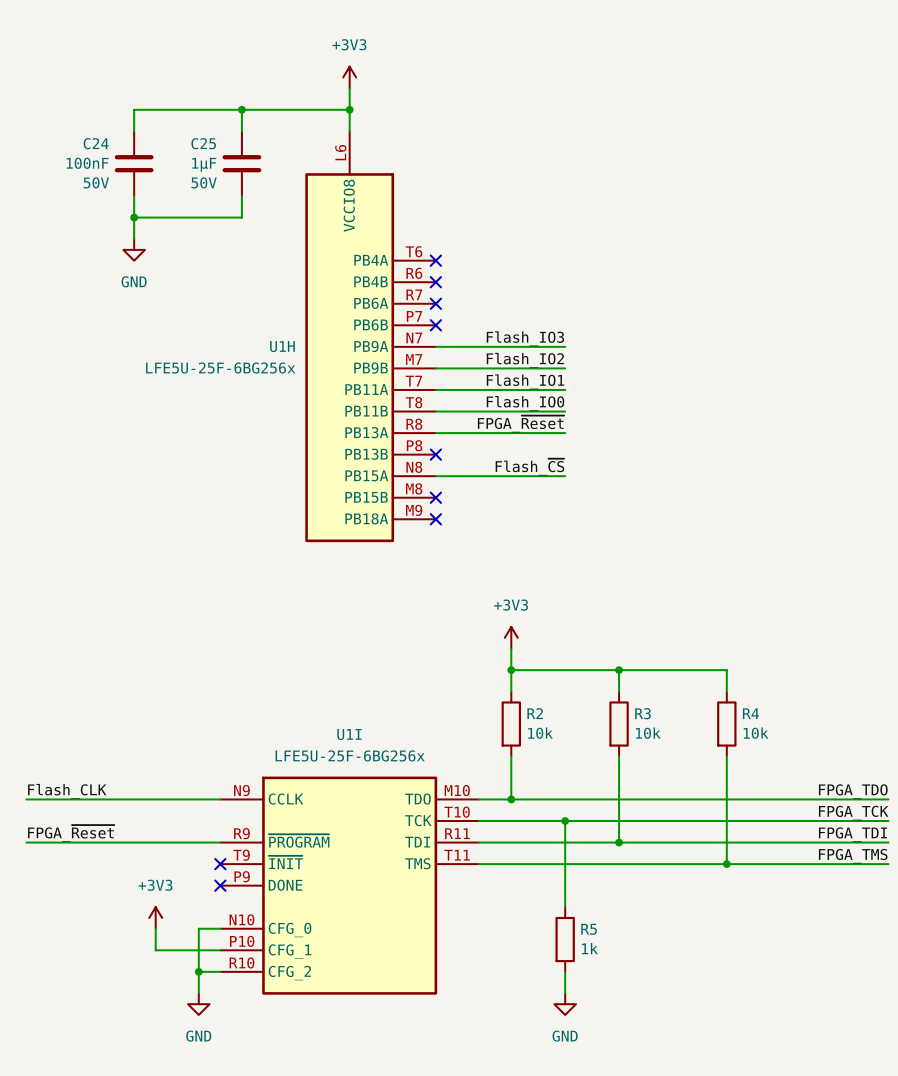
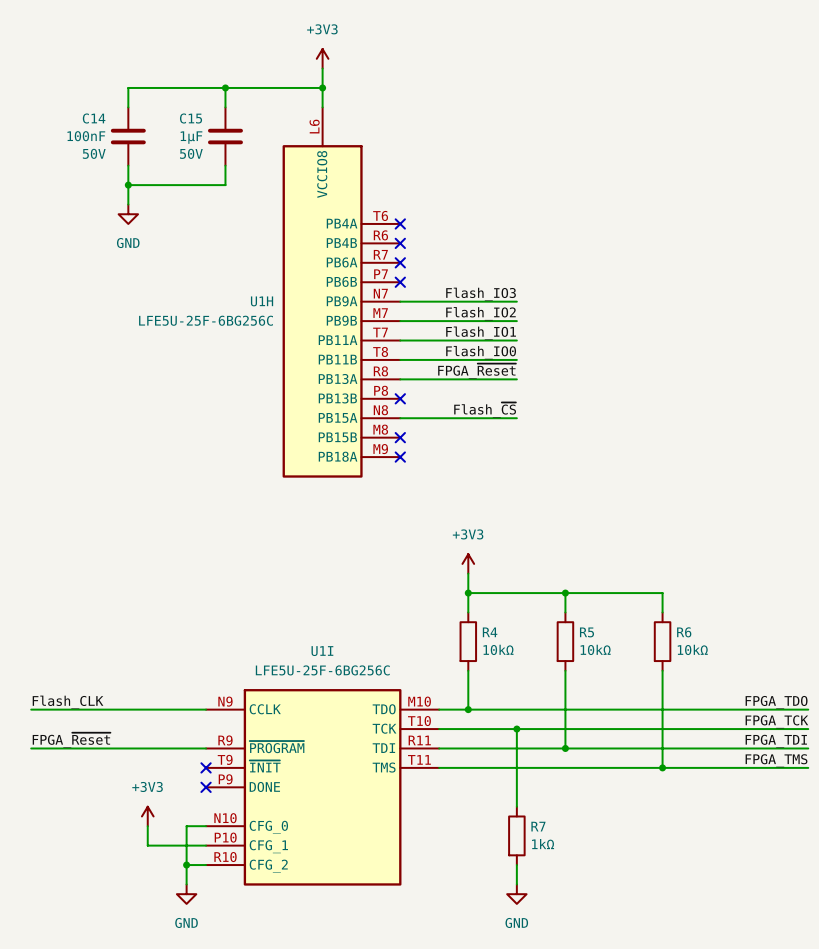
C24 name: C24 (96, 143) -> C14 (94, 118)
C25 name: C25 (203, 143) -> C15 (191, 118)
U1H value: LFE5U-25F-6BG256x (220, 368) -> LFE5U-25F-6BG256C (206, 320)
R2 name: R2 (535, 713) -> R4 (490, 632)
R3 name: R3 (643, 713) -> R5 (586, 632)
R4 name: R4 (750, 713) -> R6 (684, 632)
R2 value: 10k (540, 733) -> 10kΩ (498, 649)
R3 value: 10k (648, 733) -> 10kΩ (595, 649)
R4 value: 10k (756, 733) -> 10kΩ (692, 649)
U1I value: LFE5U-25F-6BG256x (350, 755) -> LFE5U-25F-6BG256C (322, 670)
R5 name: R5 (589, 929) -> R7 (538, 826)
R5 value: 1k (589, 948) -> 1kΩ (543, 844)

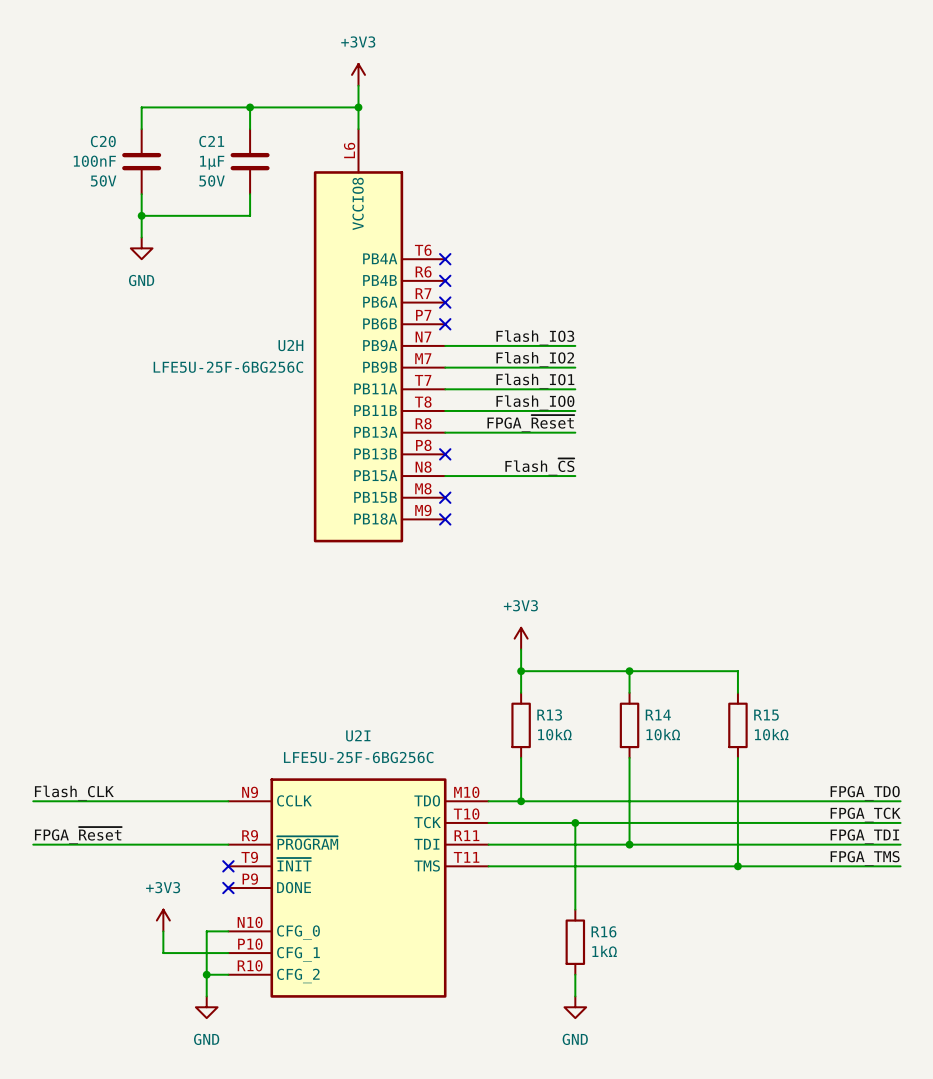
C14 name: C14 (94, 118) -> C20 (103, 141)
C15 name: C15 (191, 118) -> C21 (211, 141)
U1H name: U1H (262, 301) -> U2H (290, 345)
R4 name: R4 (490, 632) -> R13 (549, 715)
R5 name: R5 (586, 632) -> R14 (658, 715)
R6 name: R6 (684, 632) -> R15 (766, 715)
U1I name: U1I (322, 651) -> U2I (358, 735)
R7 name: R7 (538, 826) -> R16 (603, 931)

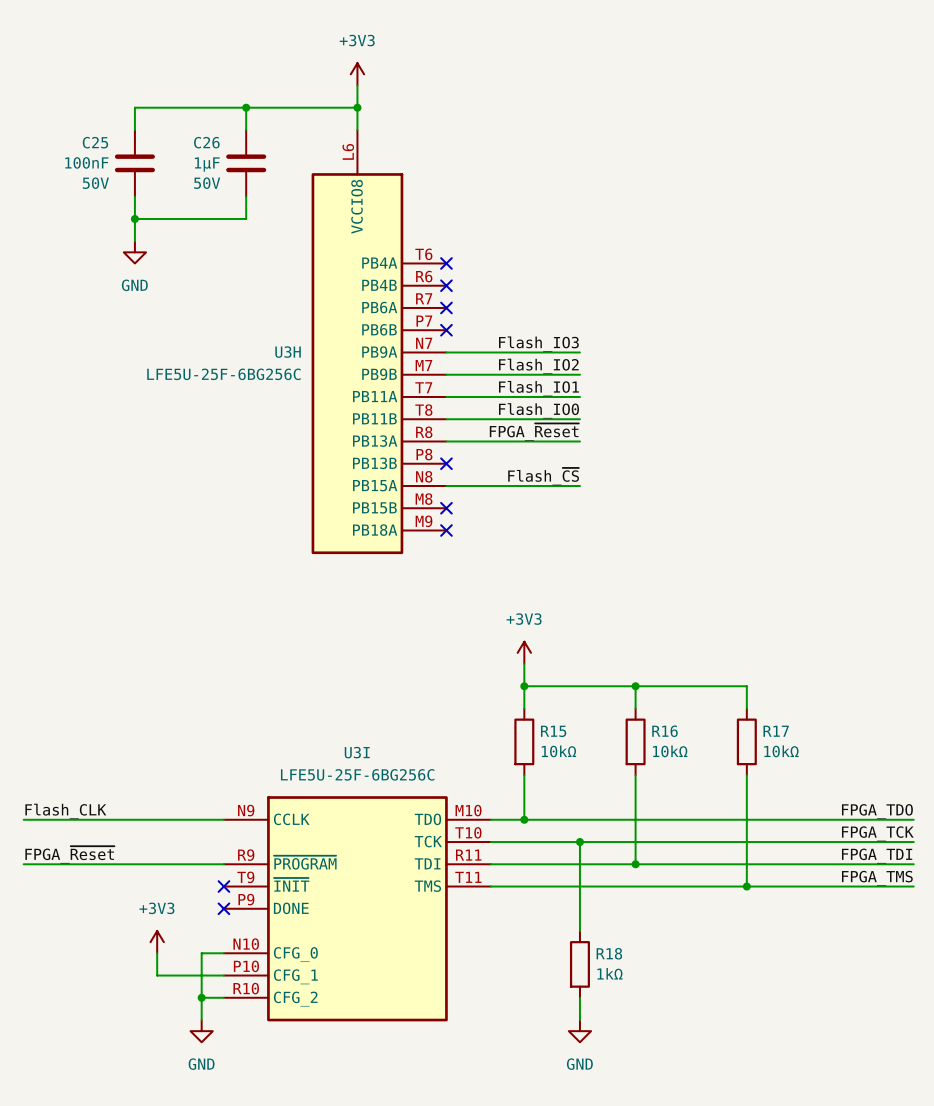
C20 name: C20 (103, 141) -> C25 (95, 142)
C21 name: C21 (211, 141) -> C26 (206, 142)
U2H name: U2H (290, 345) -> U3H (288, 352)
R13 name: R13 (549, 715) -> R15 (553, 731)
R14 name: R14 (658, 715) -> R16 (664, 731)
R15 name: R15 (766, 715) -> R17 (776, 731)
U2I name: U2I (358, 735) -> U3I (357, 752)
R16 name: R16 (603, 931) -> R18 (609, 953)

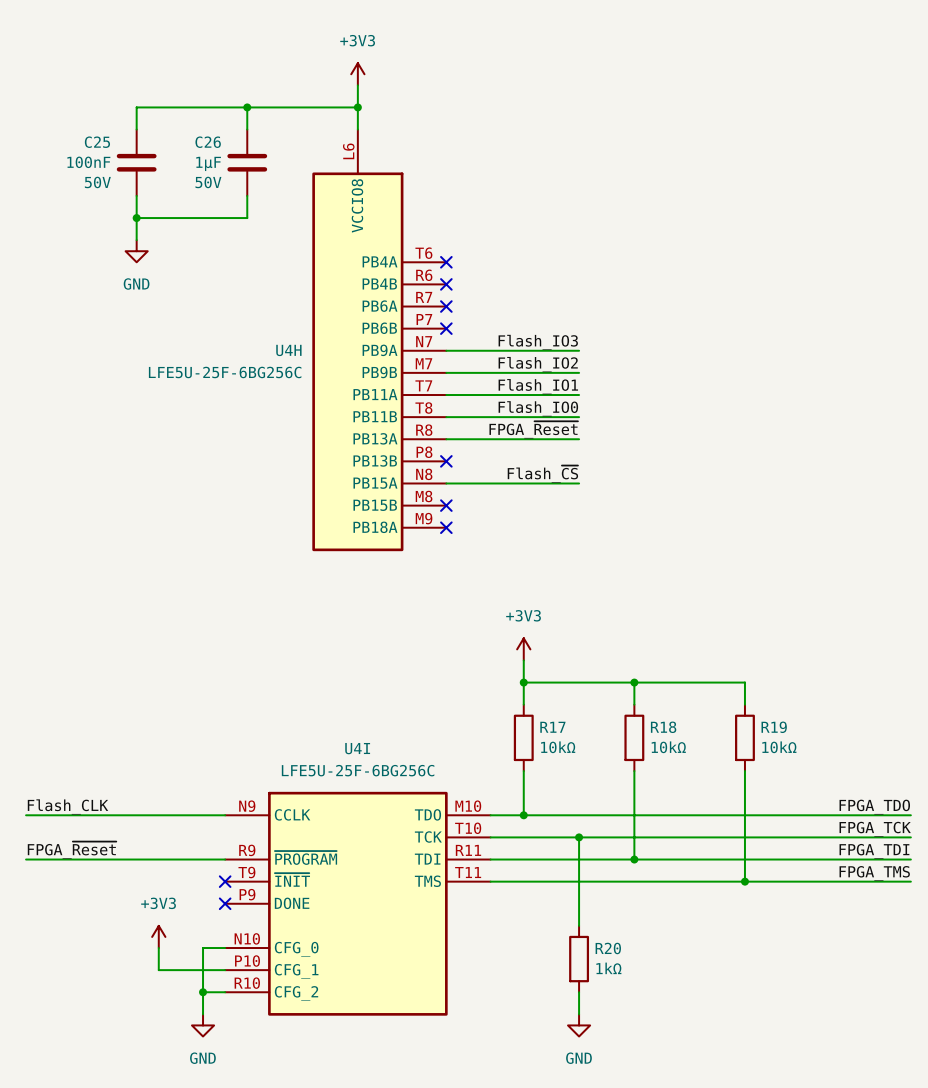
U3H name: U3H (288, 352) -> U4H (288, 350)
R15 name: R15 (553, 731) -> R17 (552, 727)
R16 name: R16 (664, 731) -> R18 (663, 727)
R17 name: R17 (776, 731) -> R19 (774, 727)
U3I name: U3I (357, 752) -> U4I (357, 748)
R18 name: R18 (609, 953) -> R20 (608, 948)

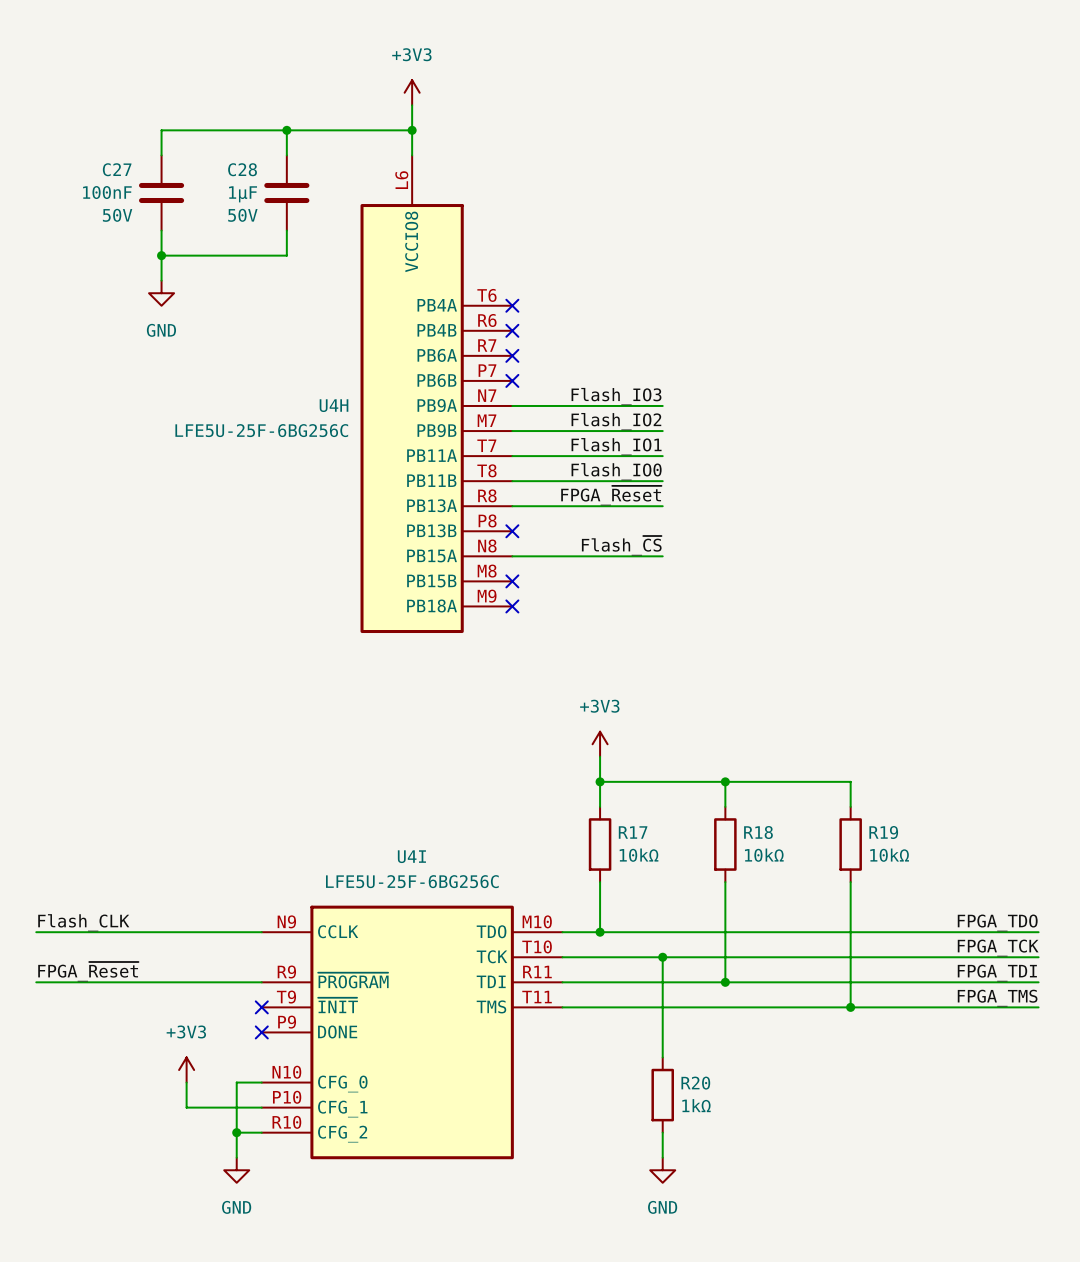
C25 name: C25 (97, 142) -> C27 (117, 169)
C26 name: C26 (208, 142) -> C28 (242, 169)

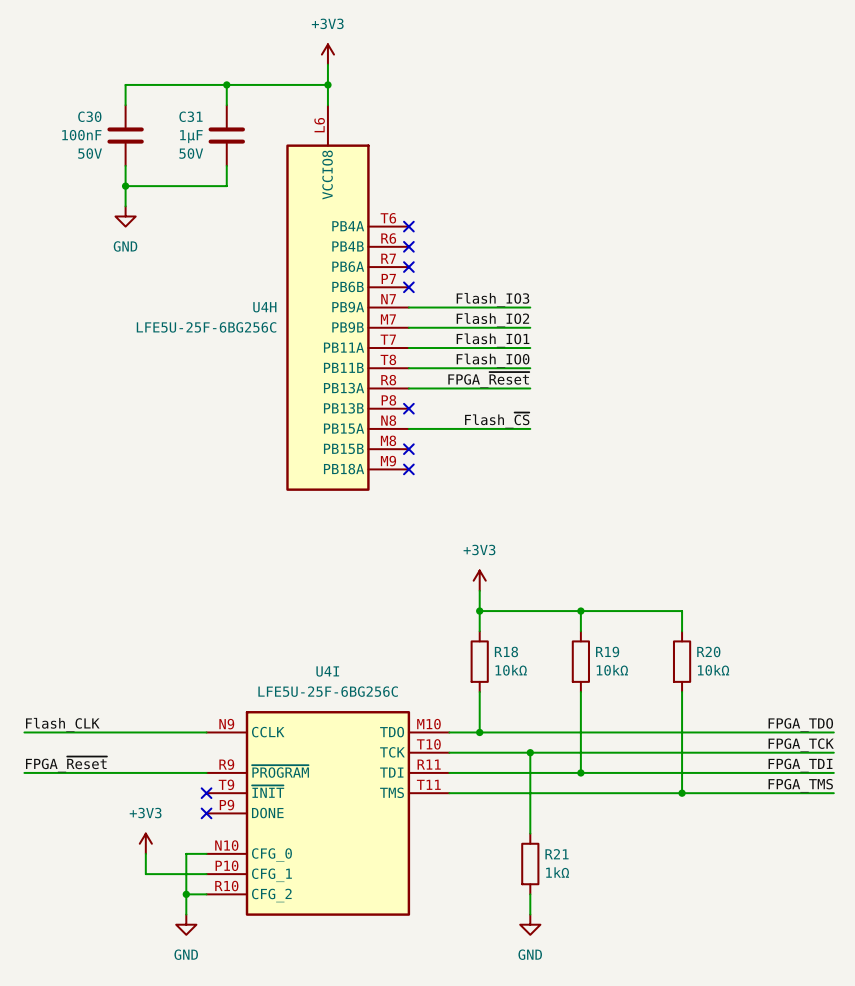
C27 name: C27 (117, 169) -> C30 (89, 116)
C28 name: C28 (242, 169) -> C31 (190, 116)
R17 name: R17 (633, 832) -> R18 (506, 651)
R18 name: R18 (758, 832) -> R19 (607, 651)
R19 name: R19 (883, 832) -> R20 (708, 651)
R20 name: R20 (695, 1083) -> R21 (557, 854)

